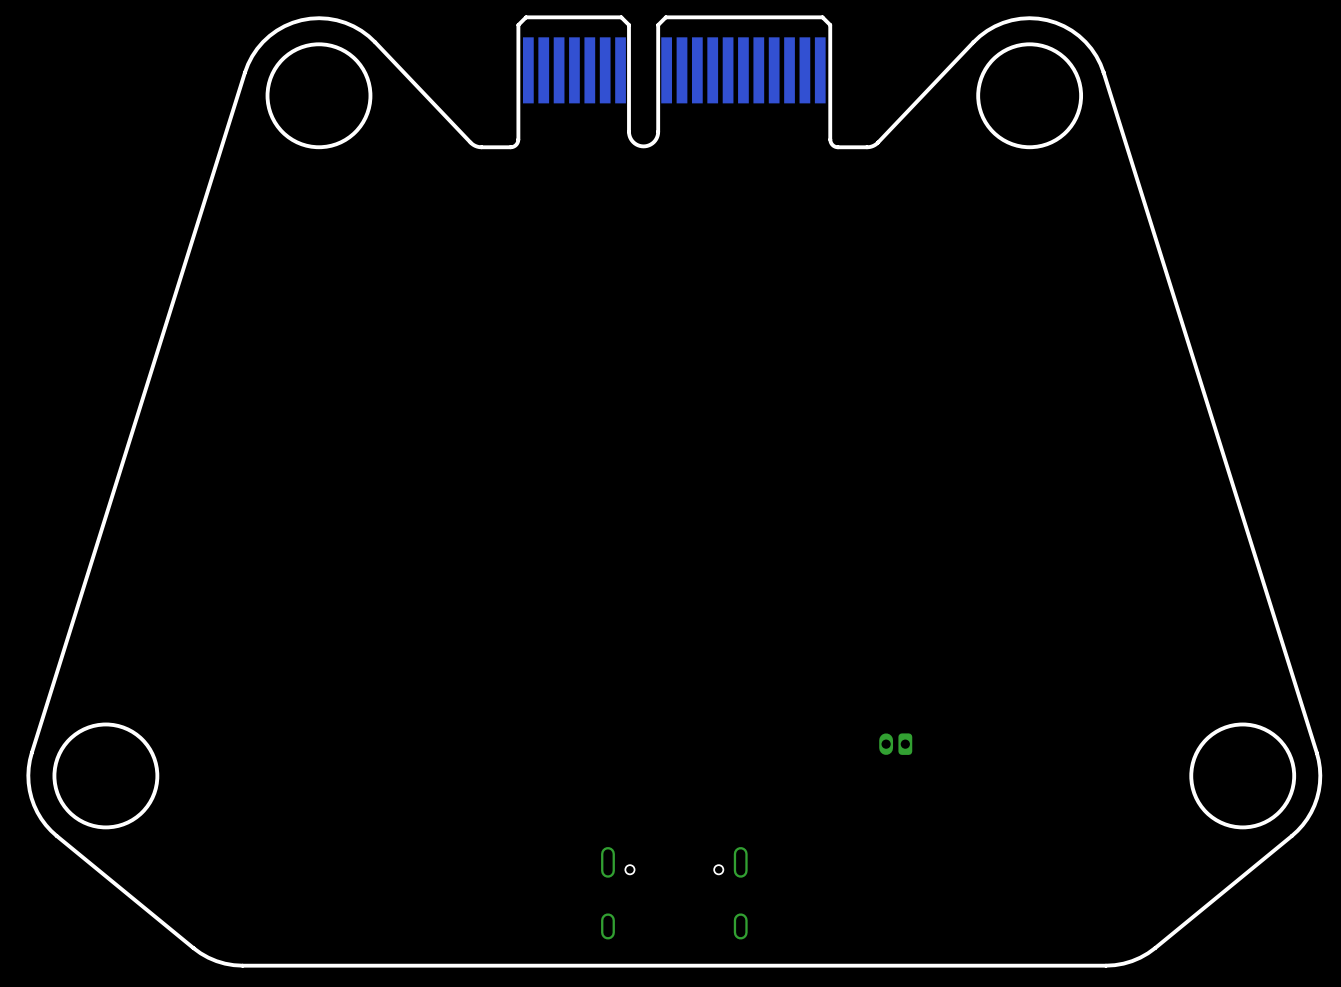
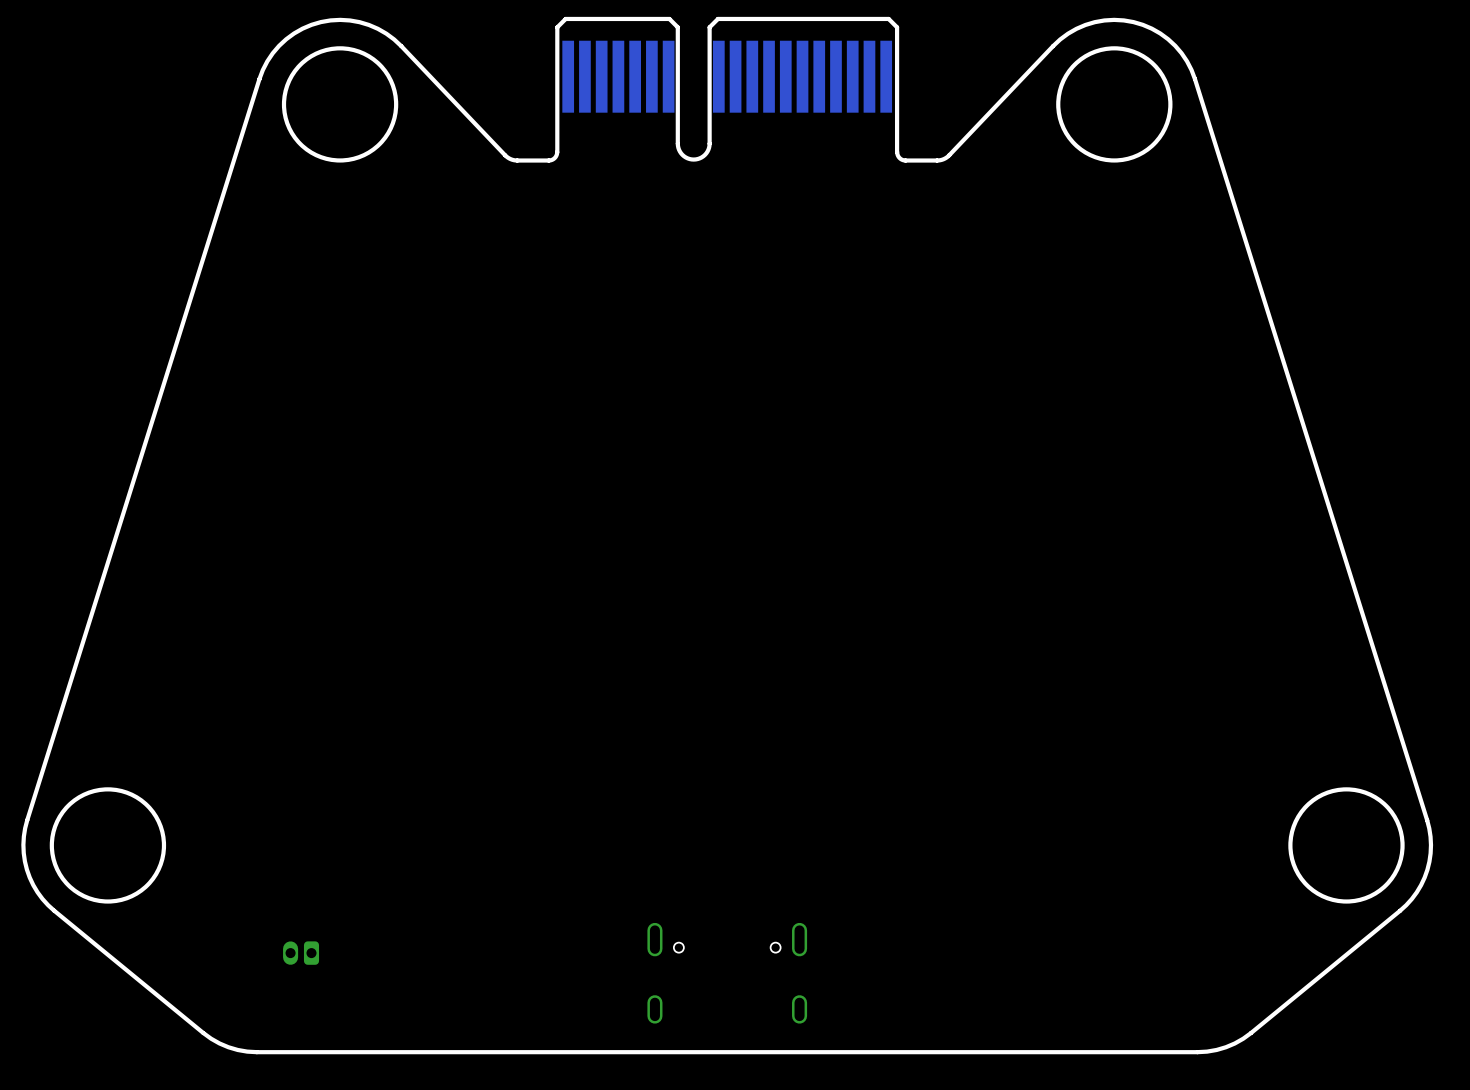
part: (895, 744) -> none
part: none -> (301, 953)

